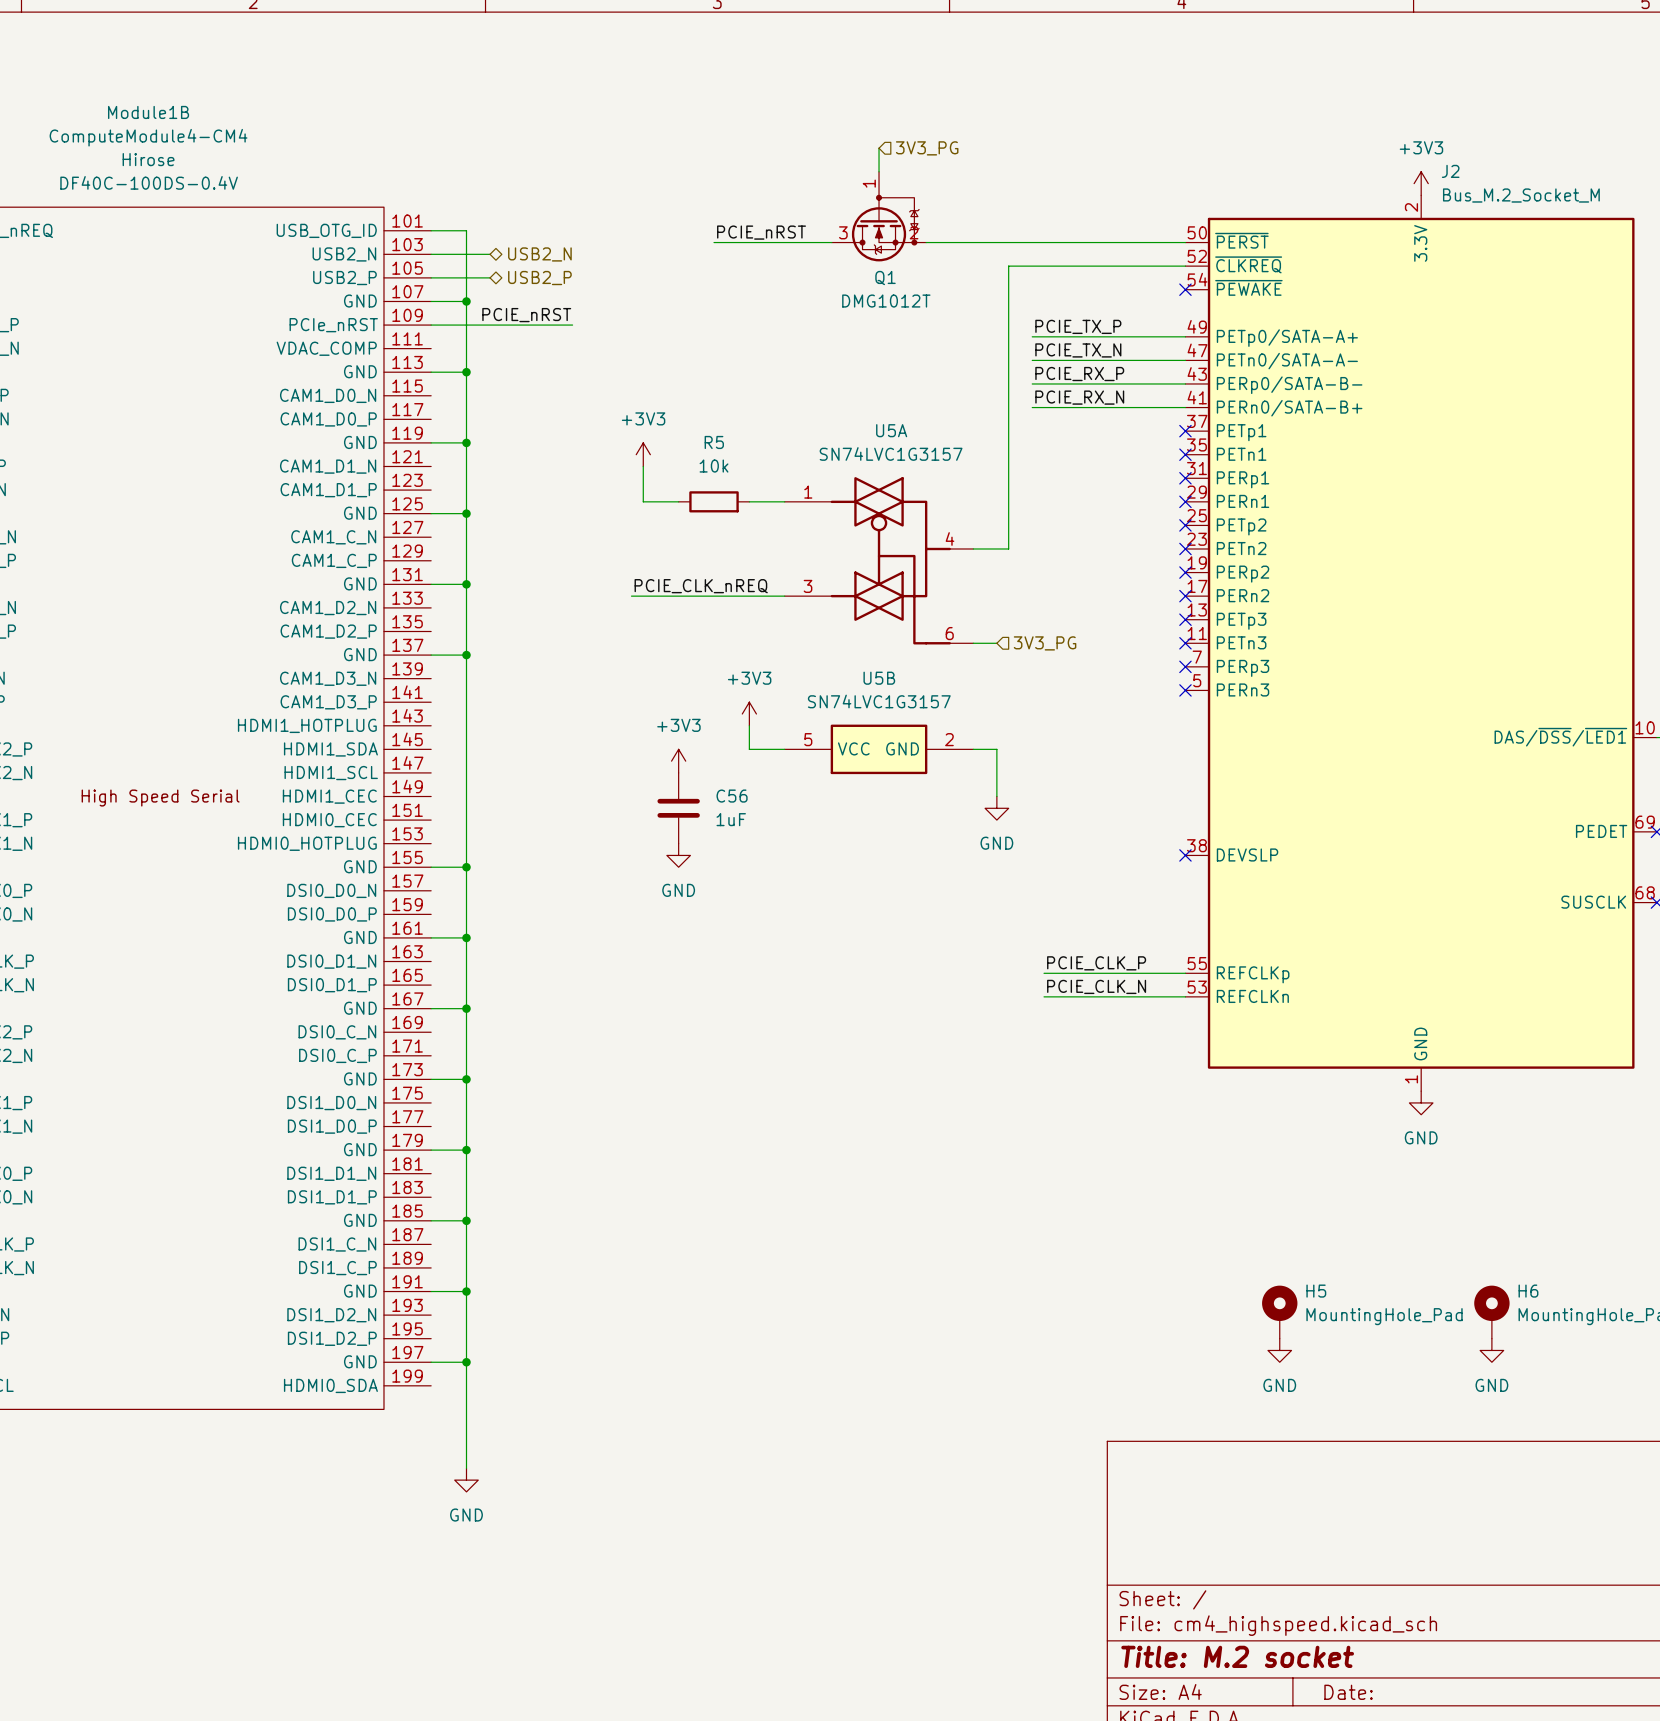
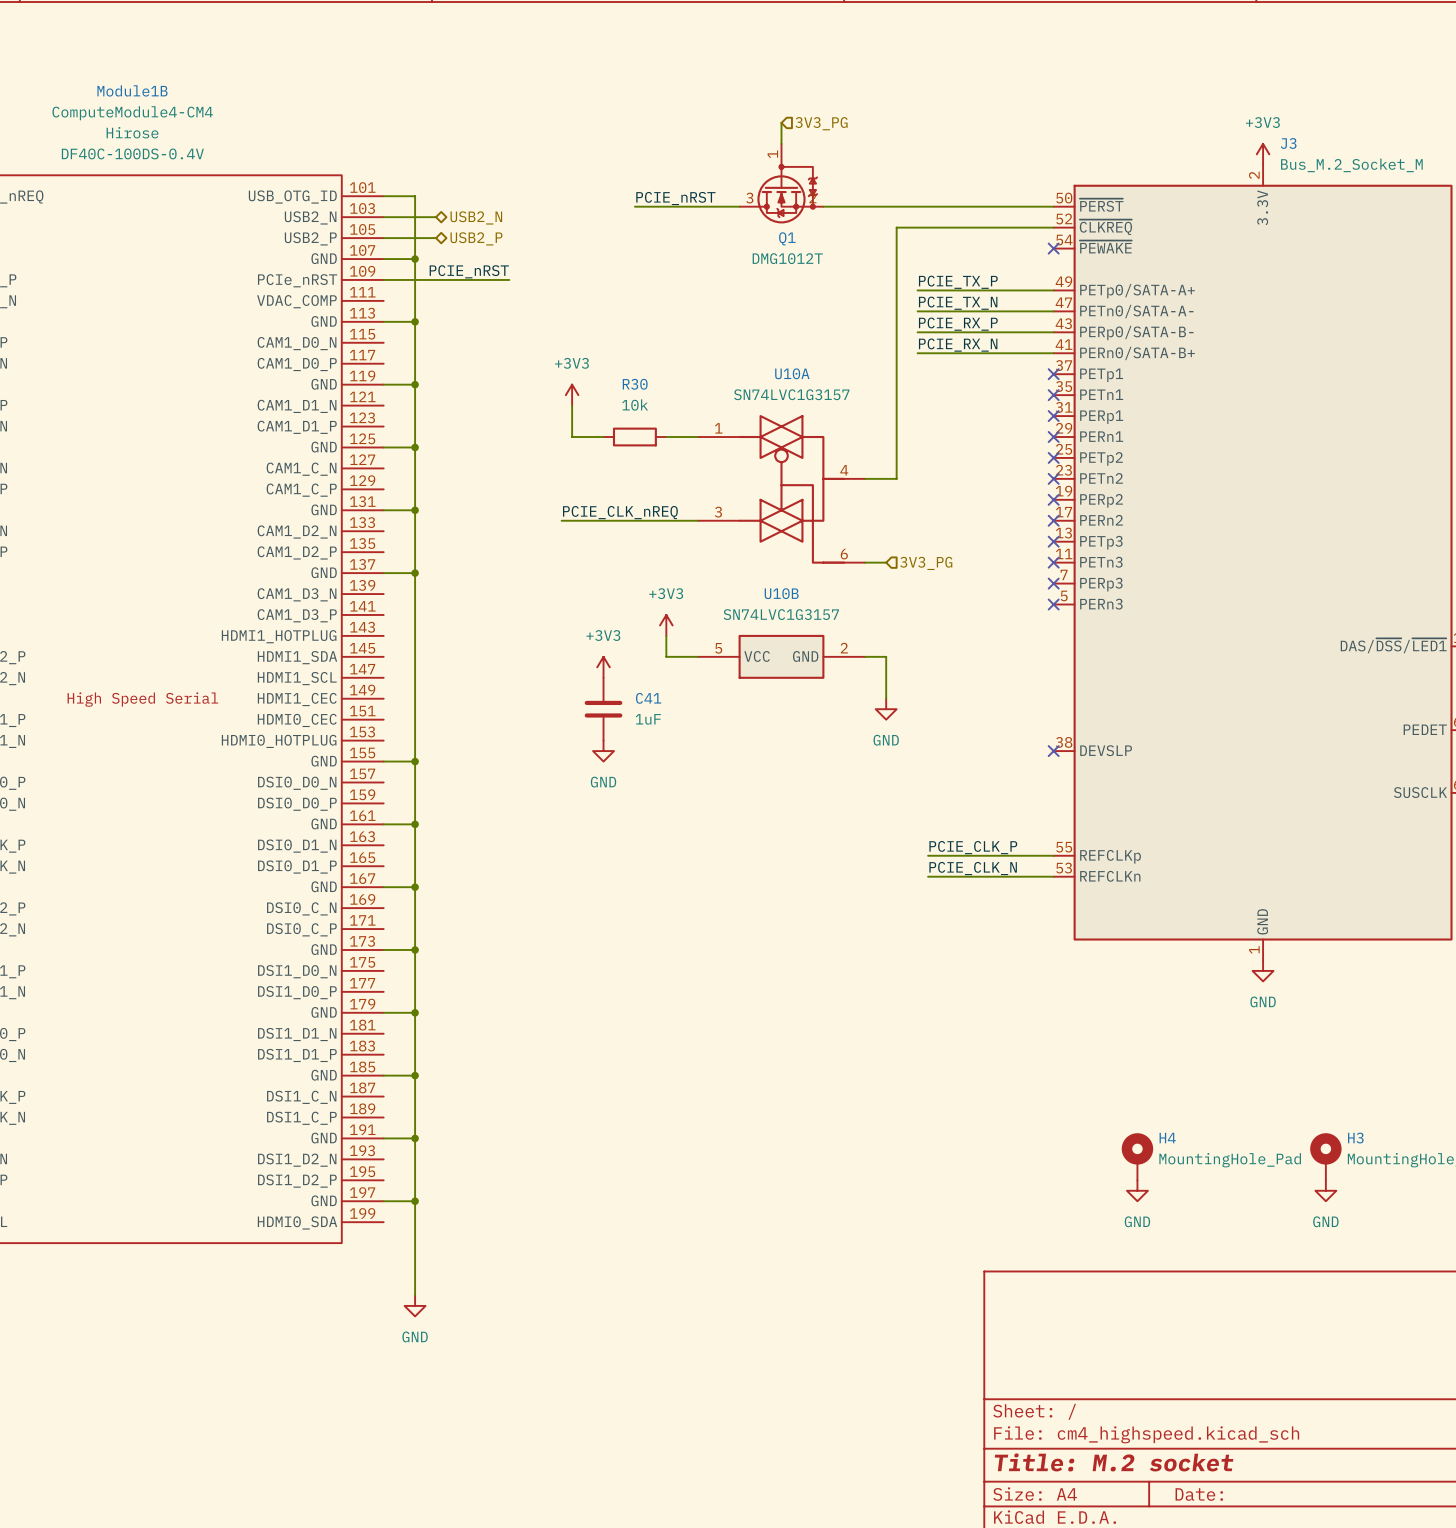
J2 name: J2 (1450, 171) -> J3 (1288, 143)
U5A name: U5A (891, 430) -> U10A (792, 373)
R5 name: R5 (714, 442) -> R30 (635, 384)
U5B name: U5B (879, 678) -> U10B (781, 593)
C56 name: C56 (732, 796) -> C41 (648, 698)
H5 name: H5 (1316, 1291) -> H4 (1167, 1138)
H6 name: H6 (1528, 1291) -> H3 (1355, 1138)

